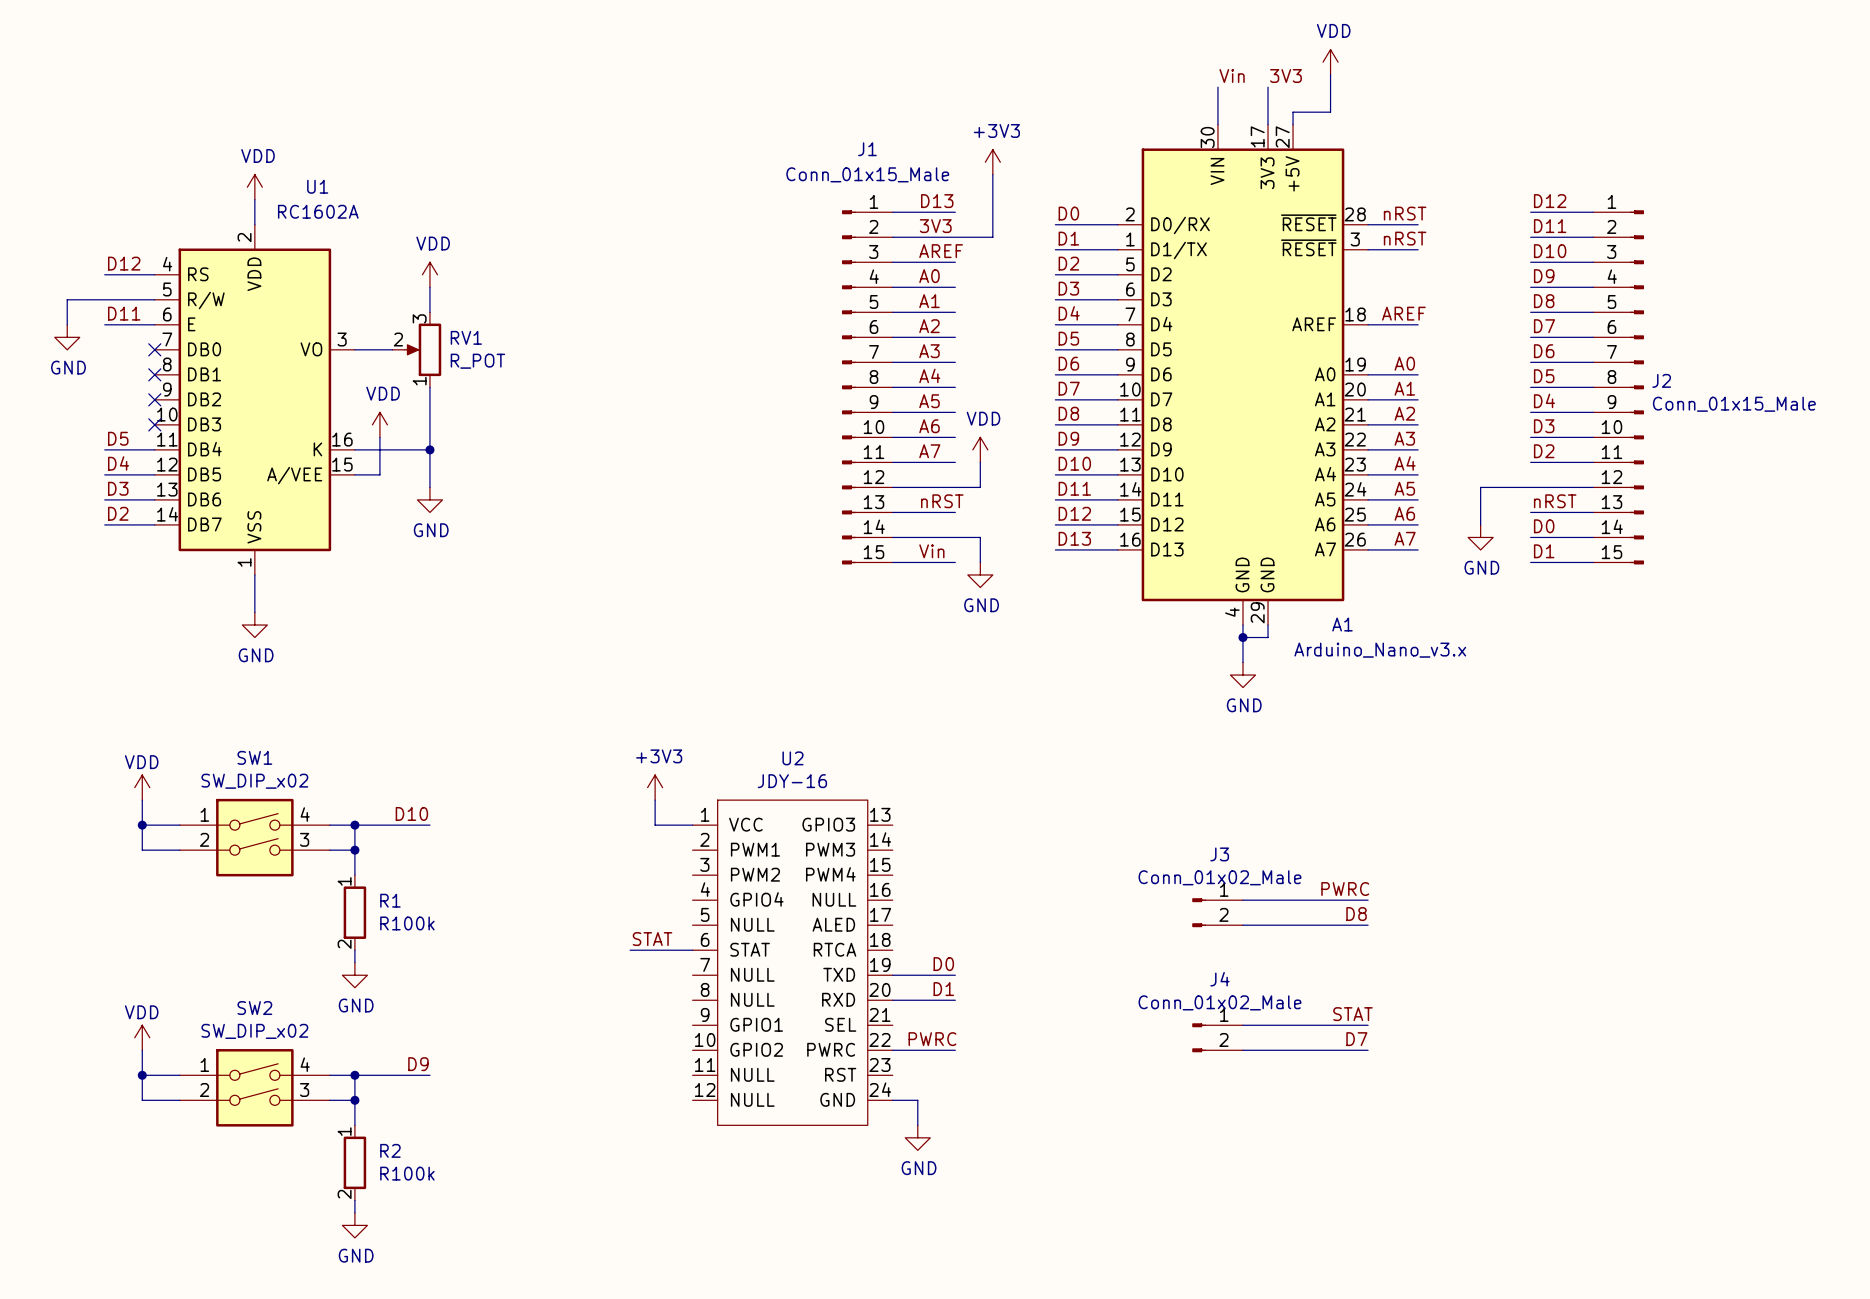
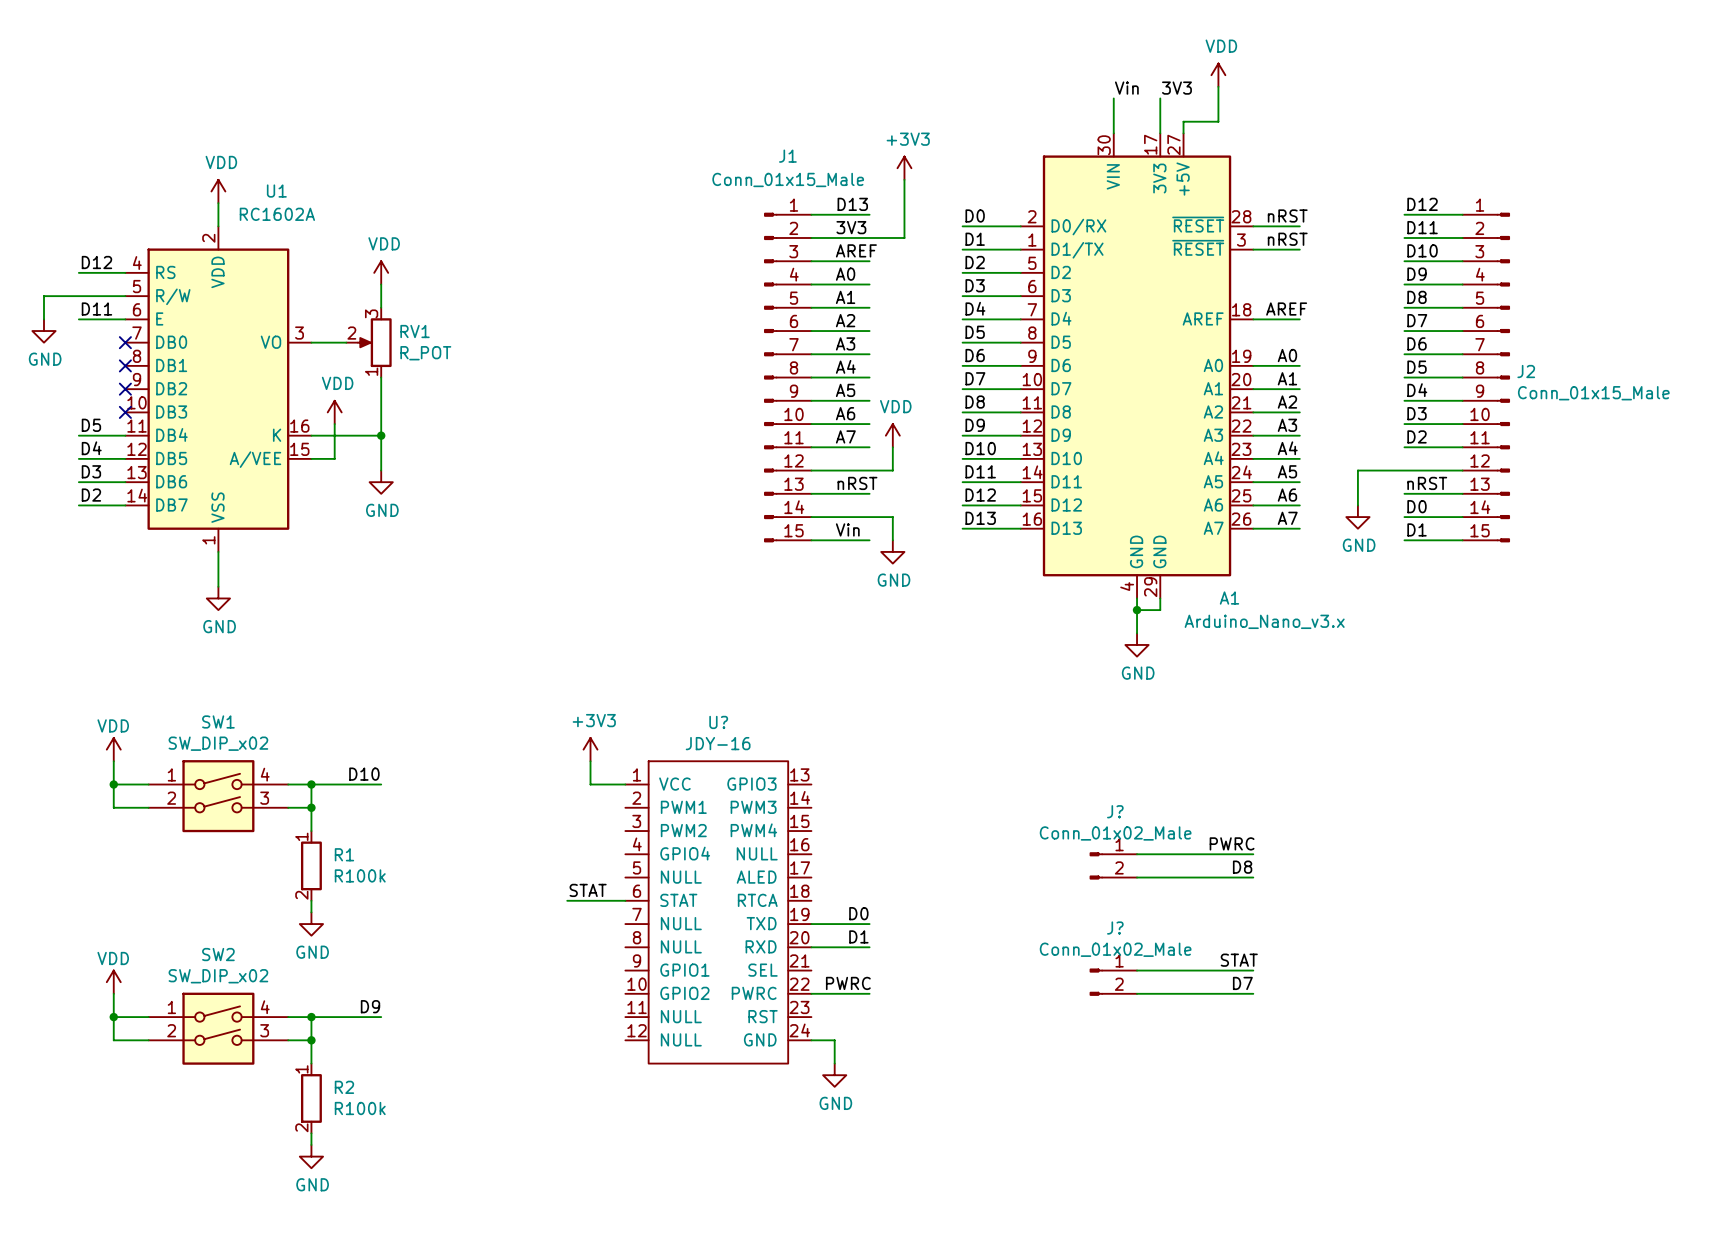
U2 name: U2 (793, 758) -> U? (718, 722)
J3 name: J3 (1219, 854) -> J? (1115, 811)
J4 name: J4 (1219, 979) -> J? (1115, 928)

